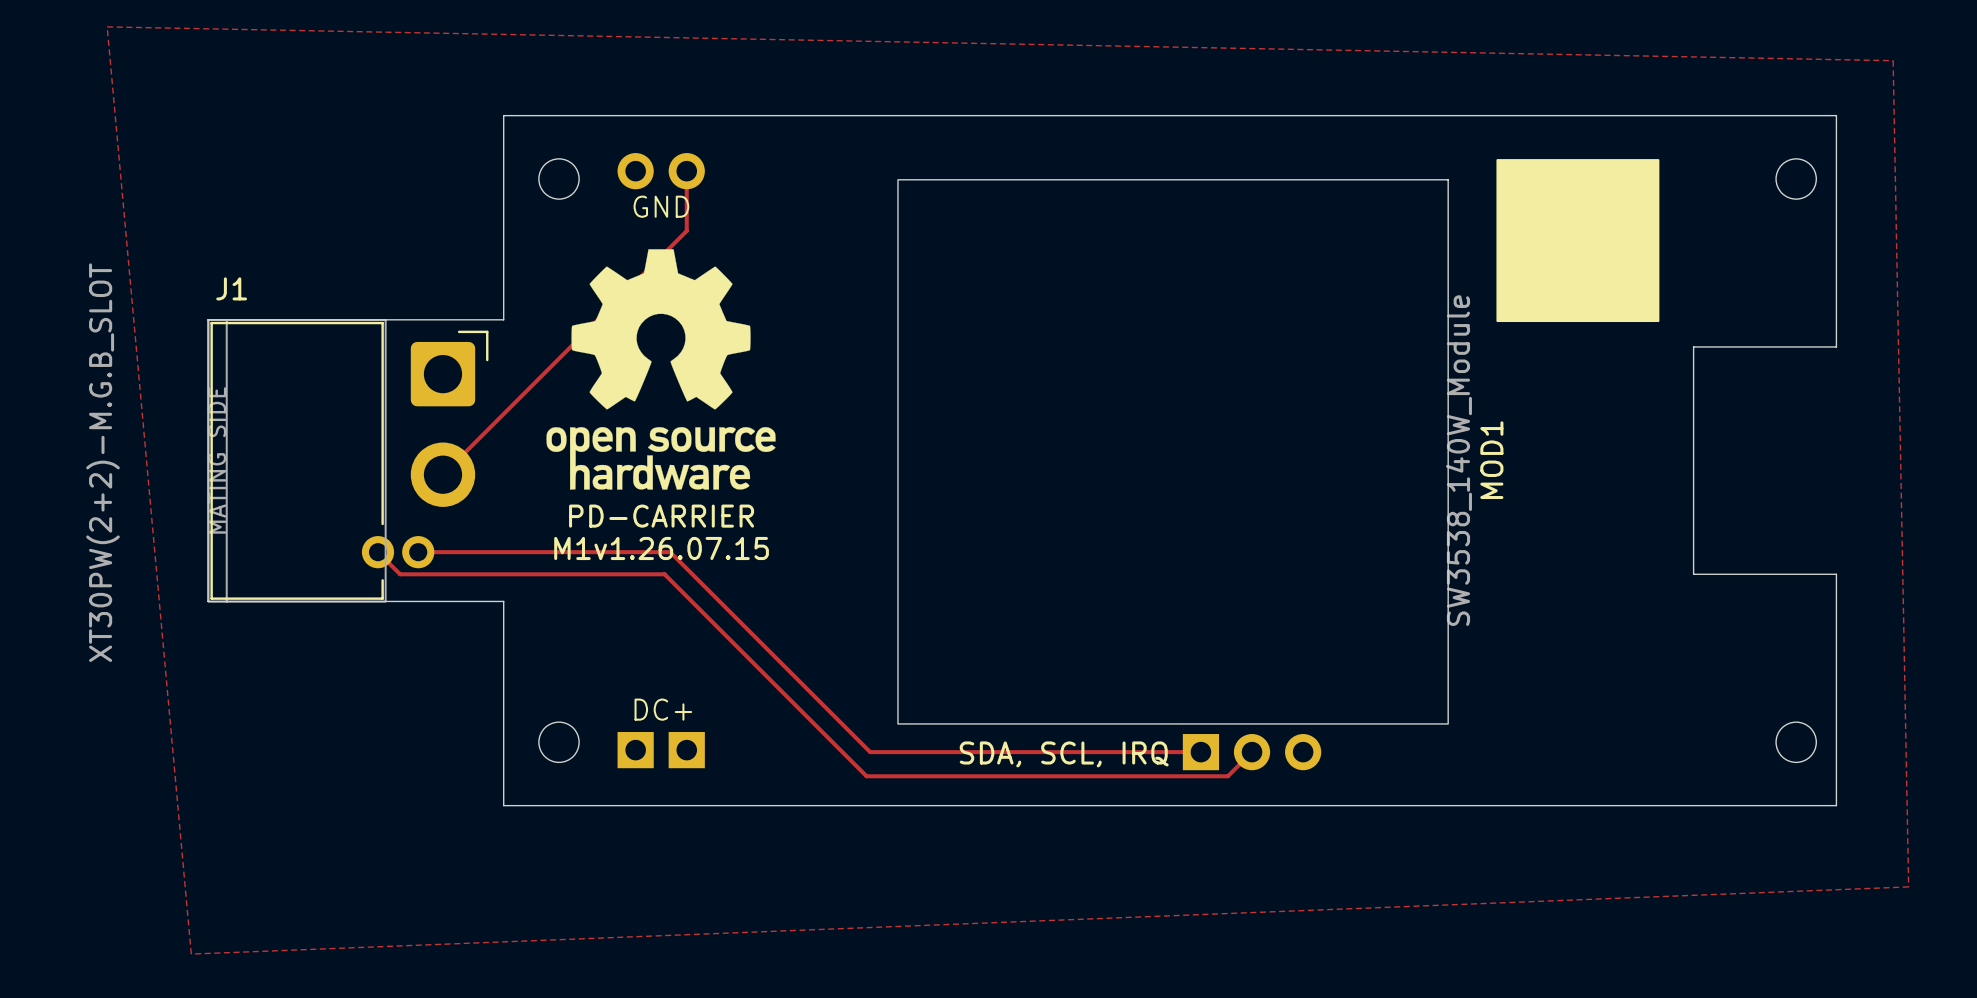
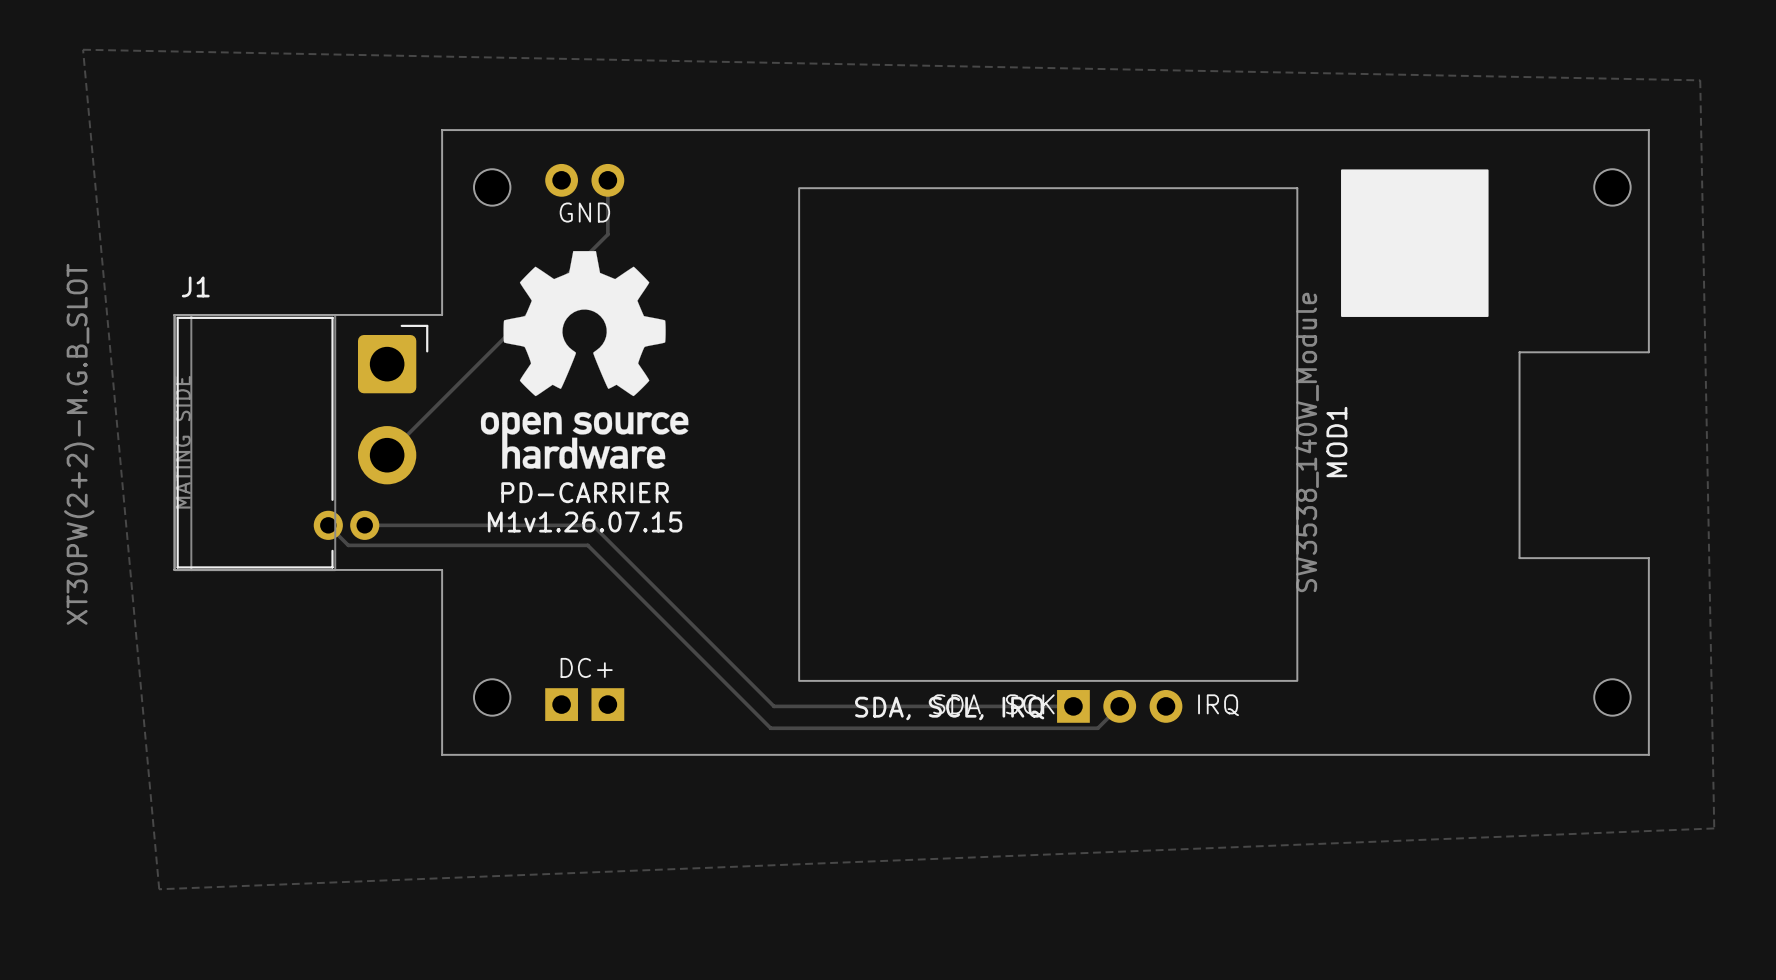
MOD1 footprint: [538, 153, 1837, 771] -> [473, 163, 1650, 723]
board edge: (1836, 574) (1836, 588) -> (1648, 339) (1648, 352)

